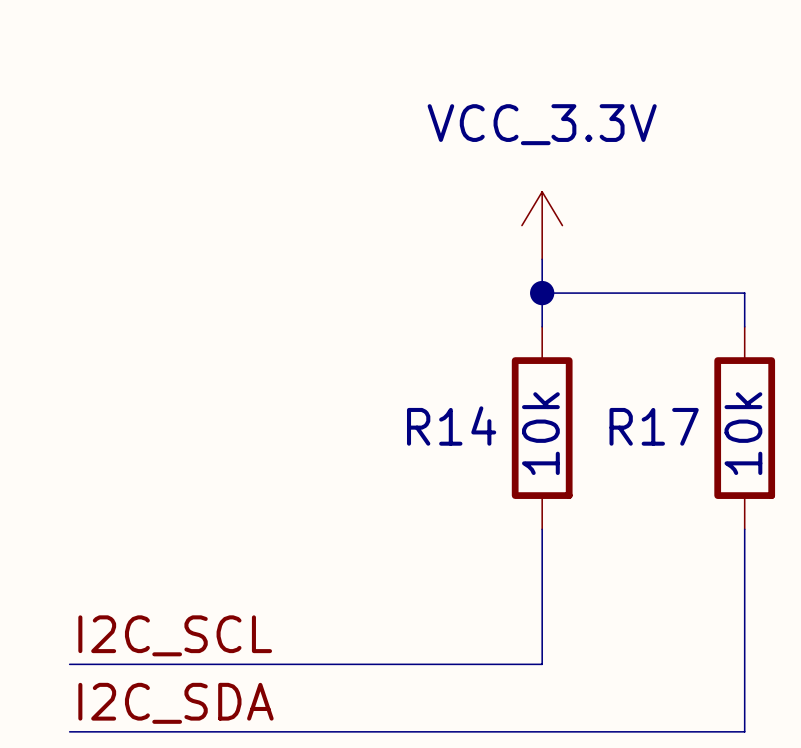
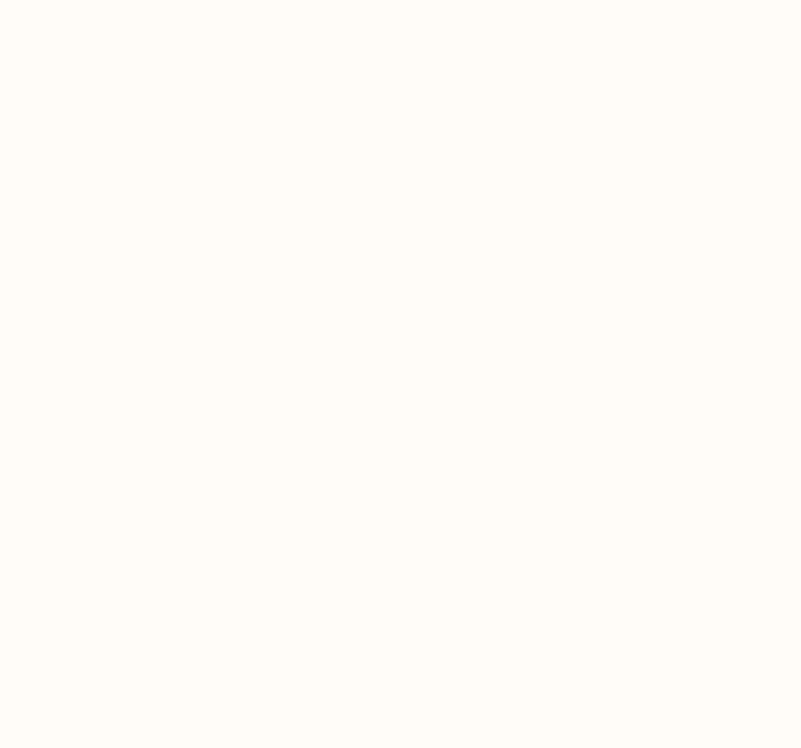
power symbol: VCC_3.3V (542, 225) -> none
wire: (542, 259) (542, 326) -> none
wire: (542, 293) (744, 293) (744, 326) -> none
junction: (542, 293) -> none
R14: 10k (542, 428) -> none
R17: 10k (744, 428) -> none
wire: (542, 529) (542, 664) (69, 664) -> none
wire: (744, 529) (744, 731) (69, 731) -> none
label: I2C_SCL (175, 635) -> none
label: I2C_SDA (175, 703) -> none

